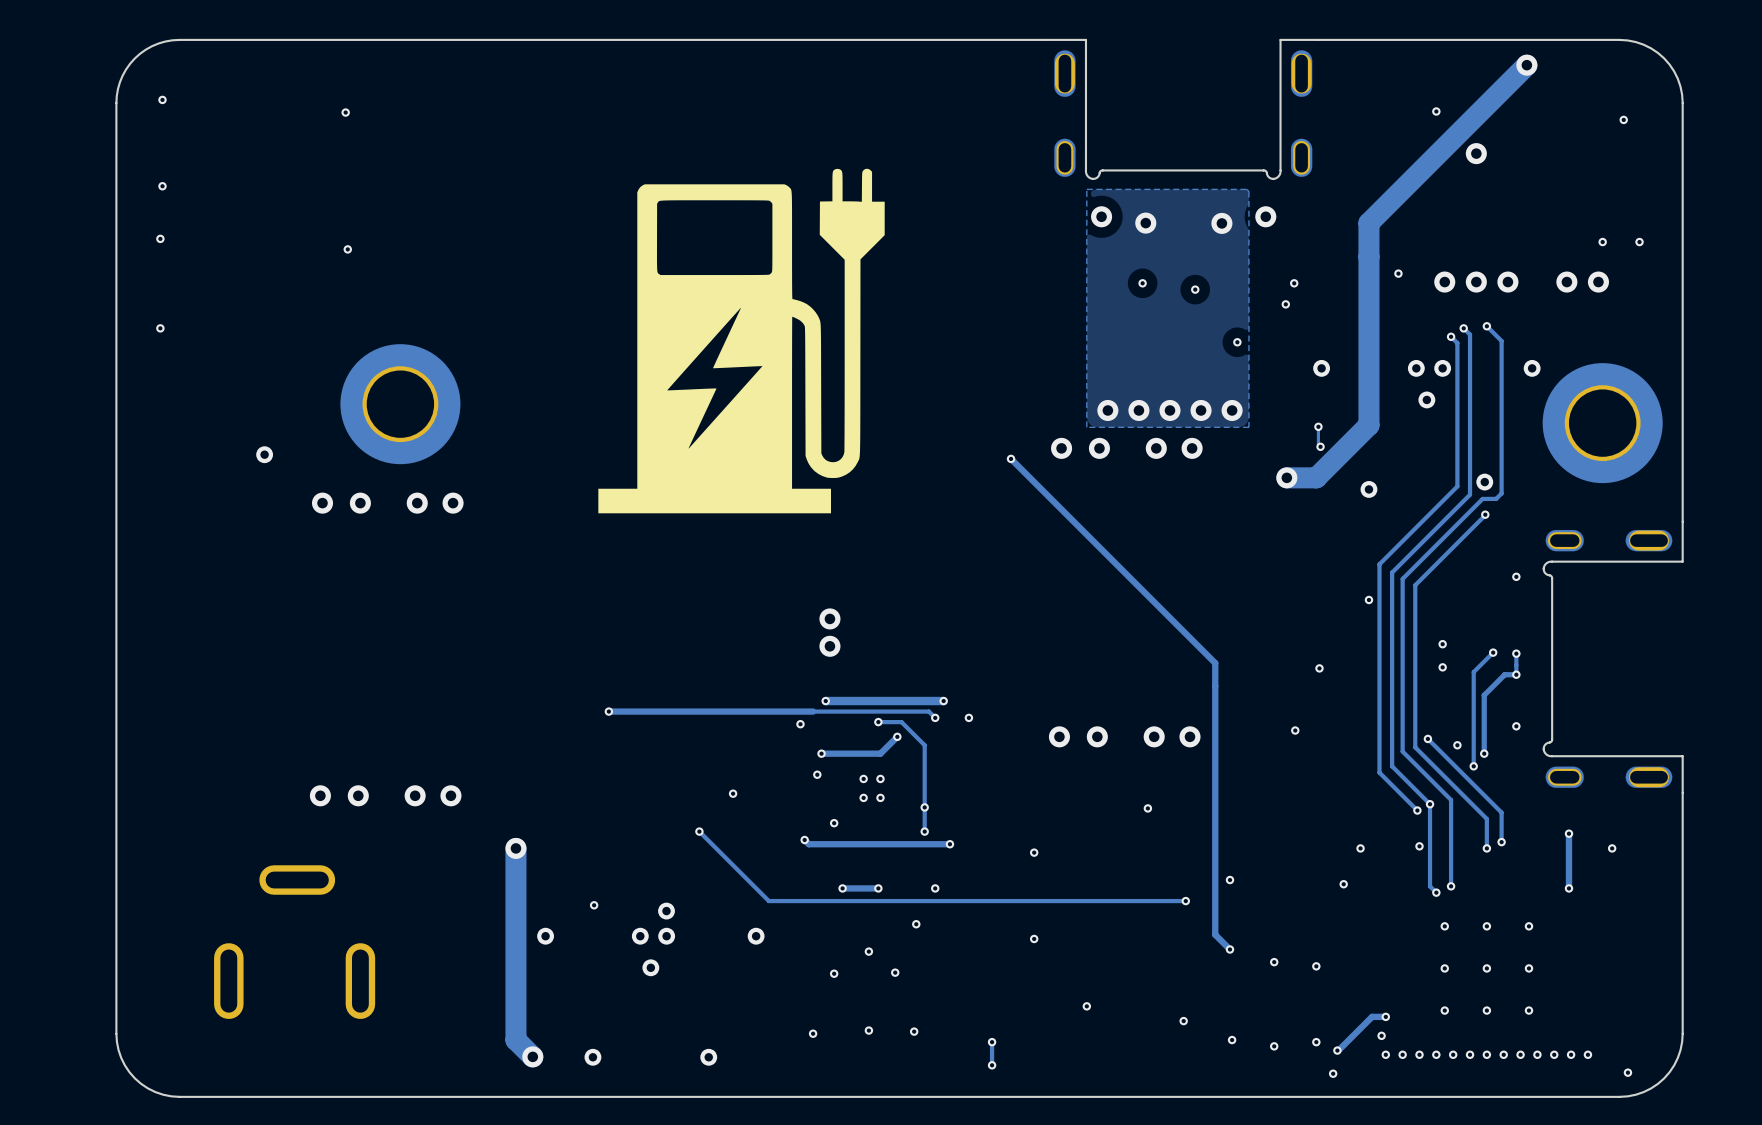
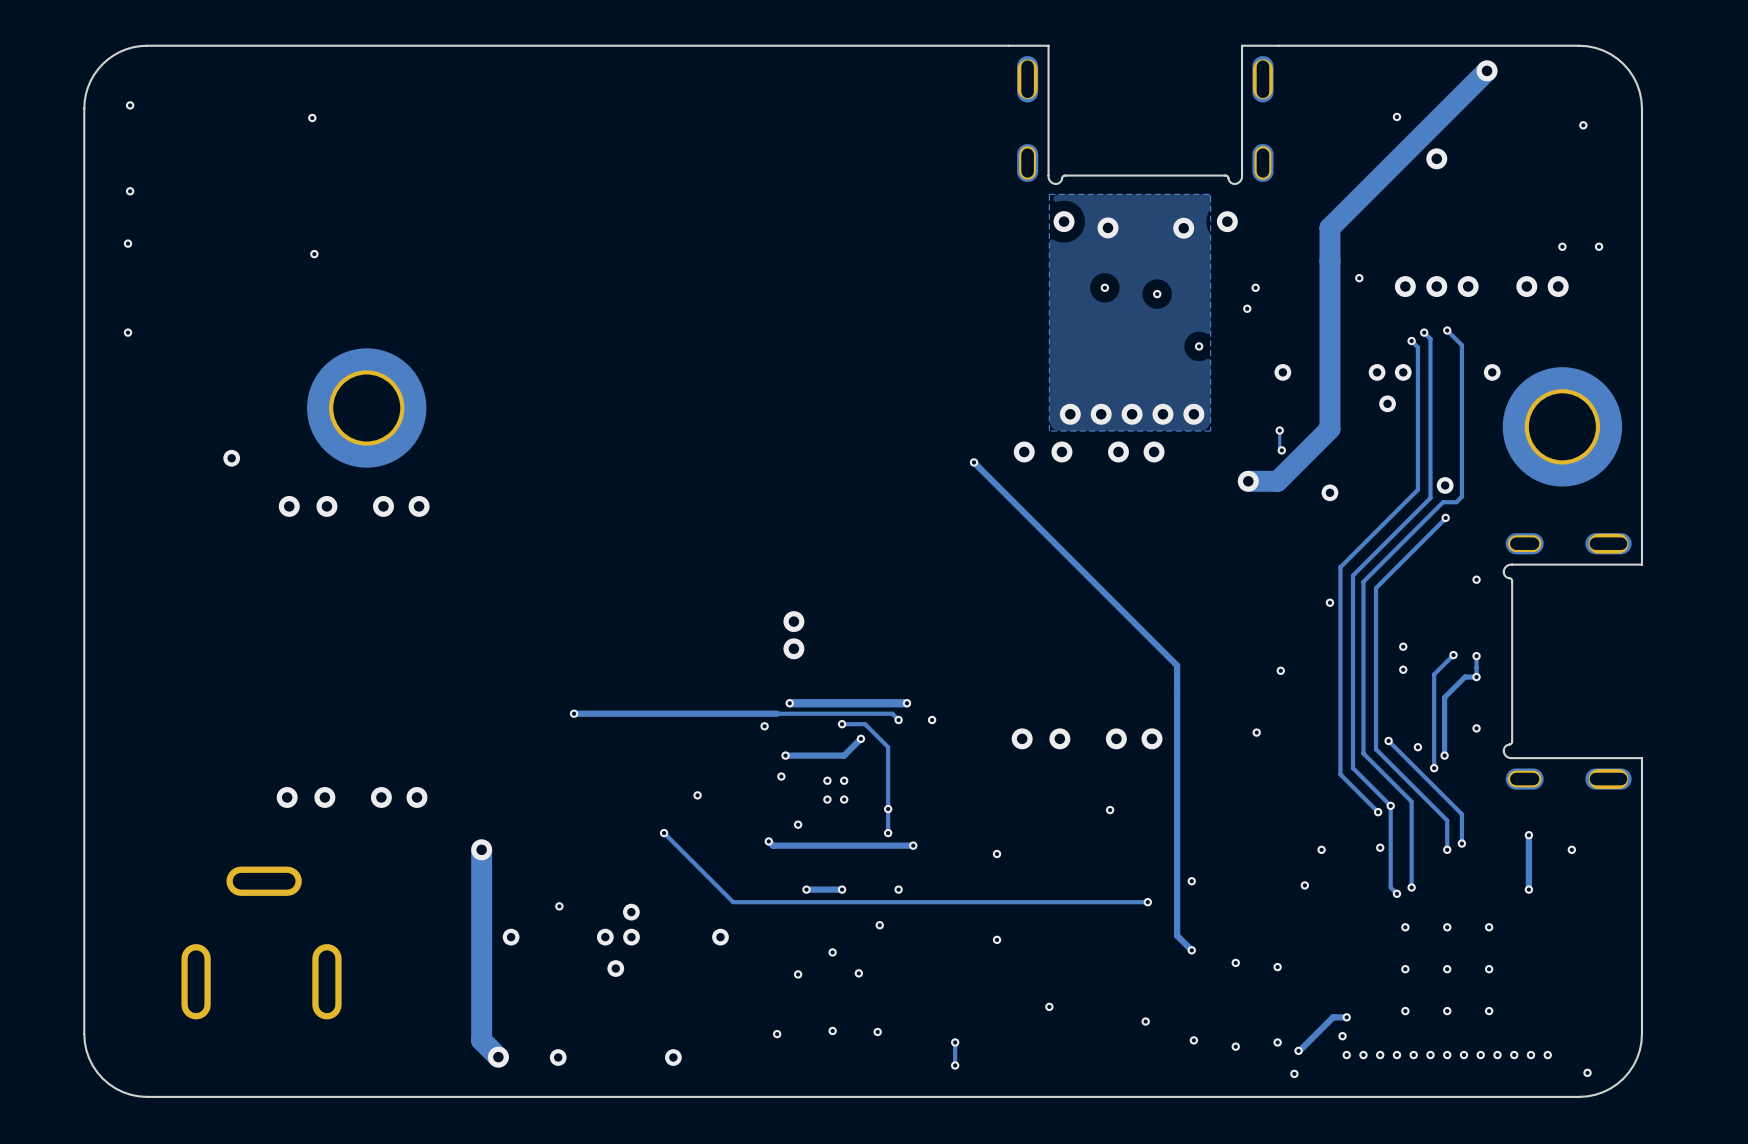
drawing: [598, 168, 885, 514] -> none

